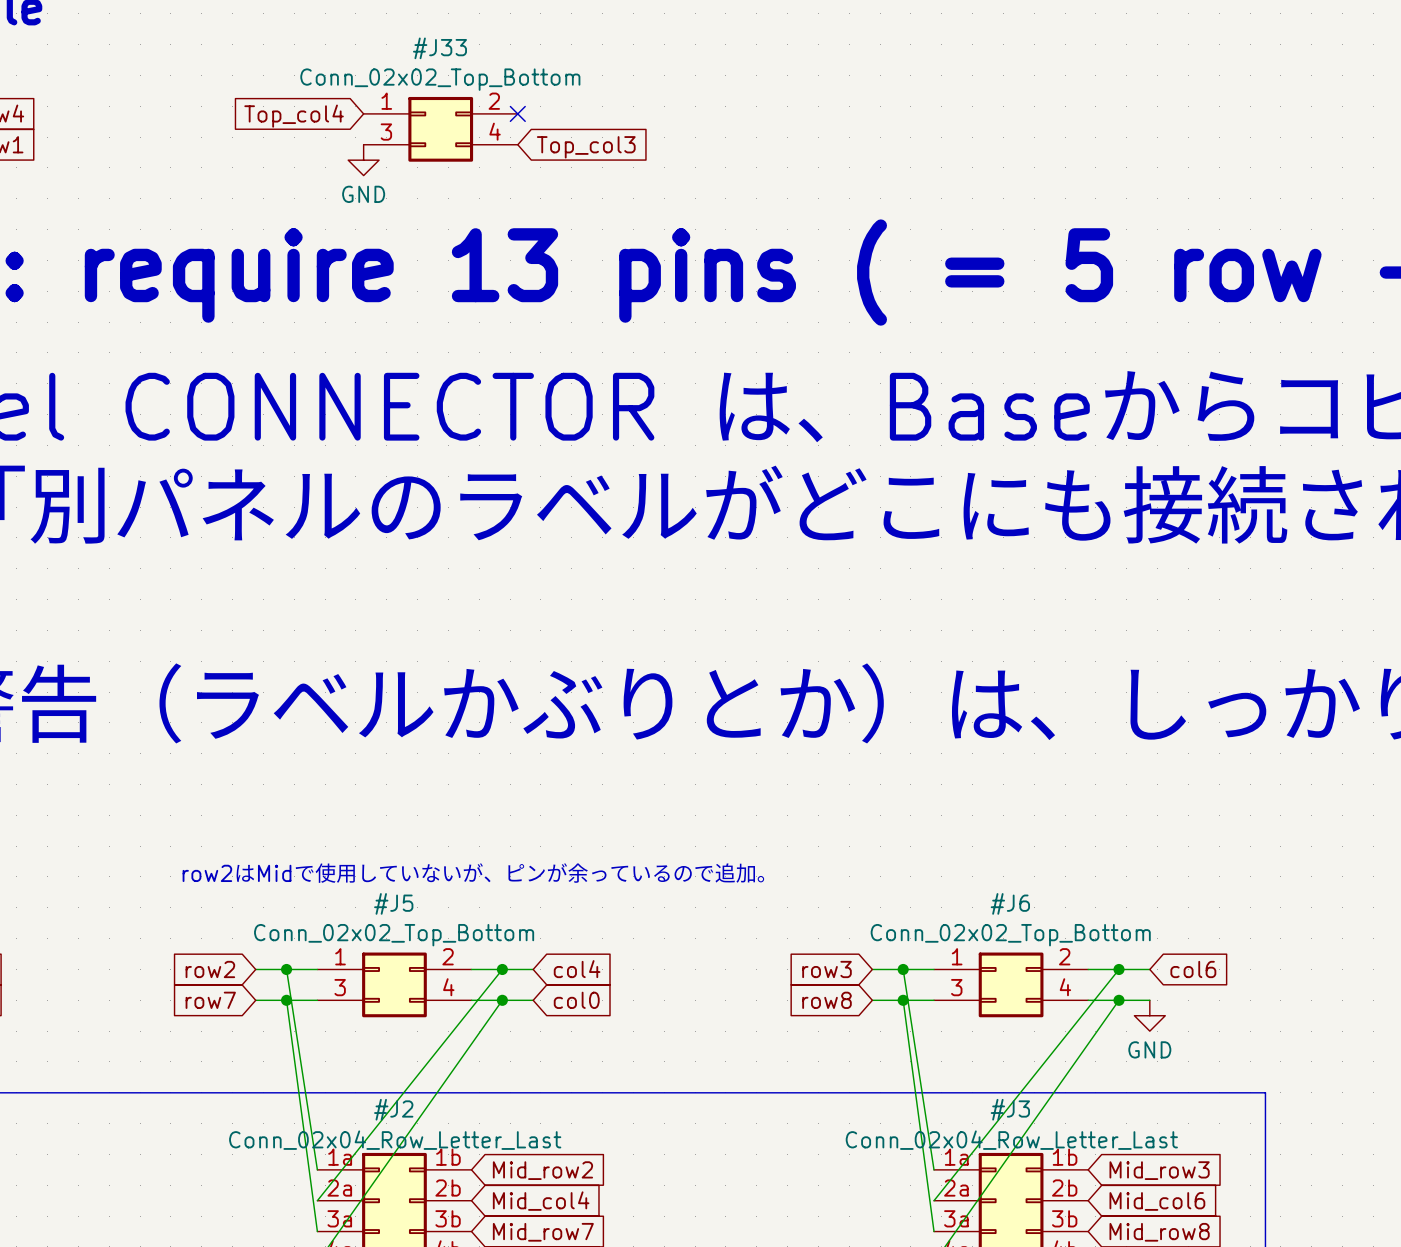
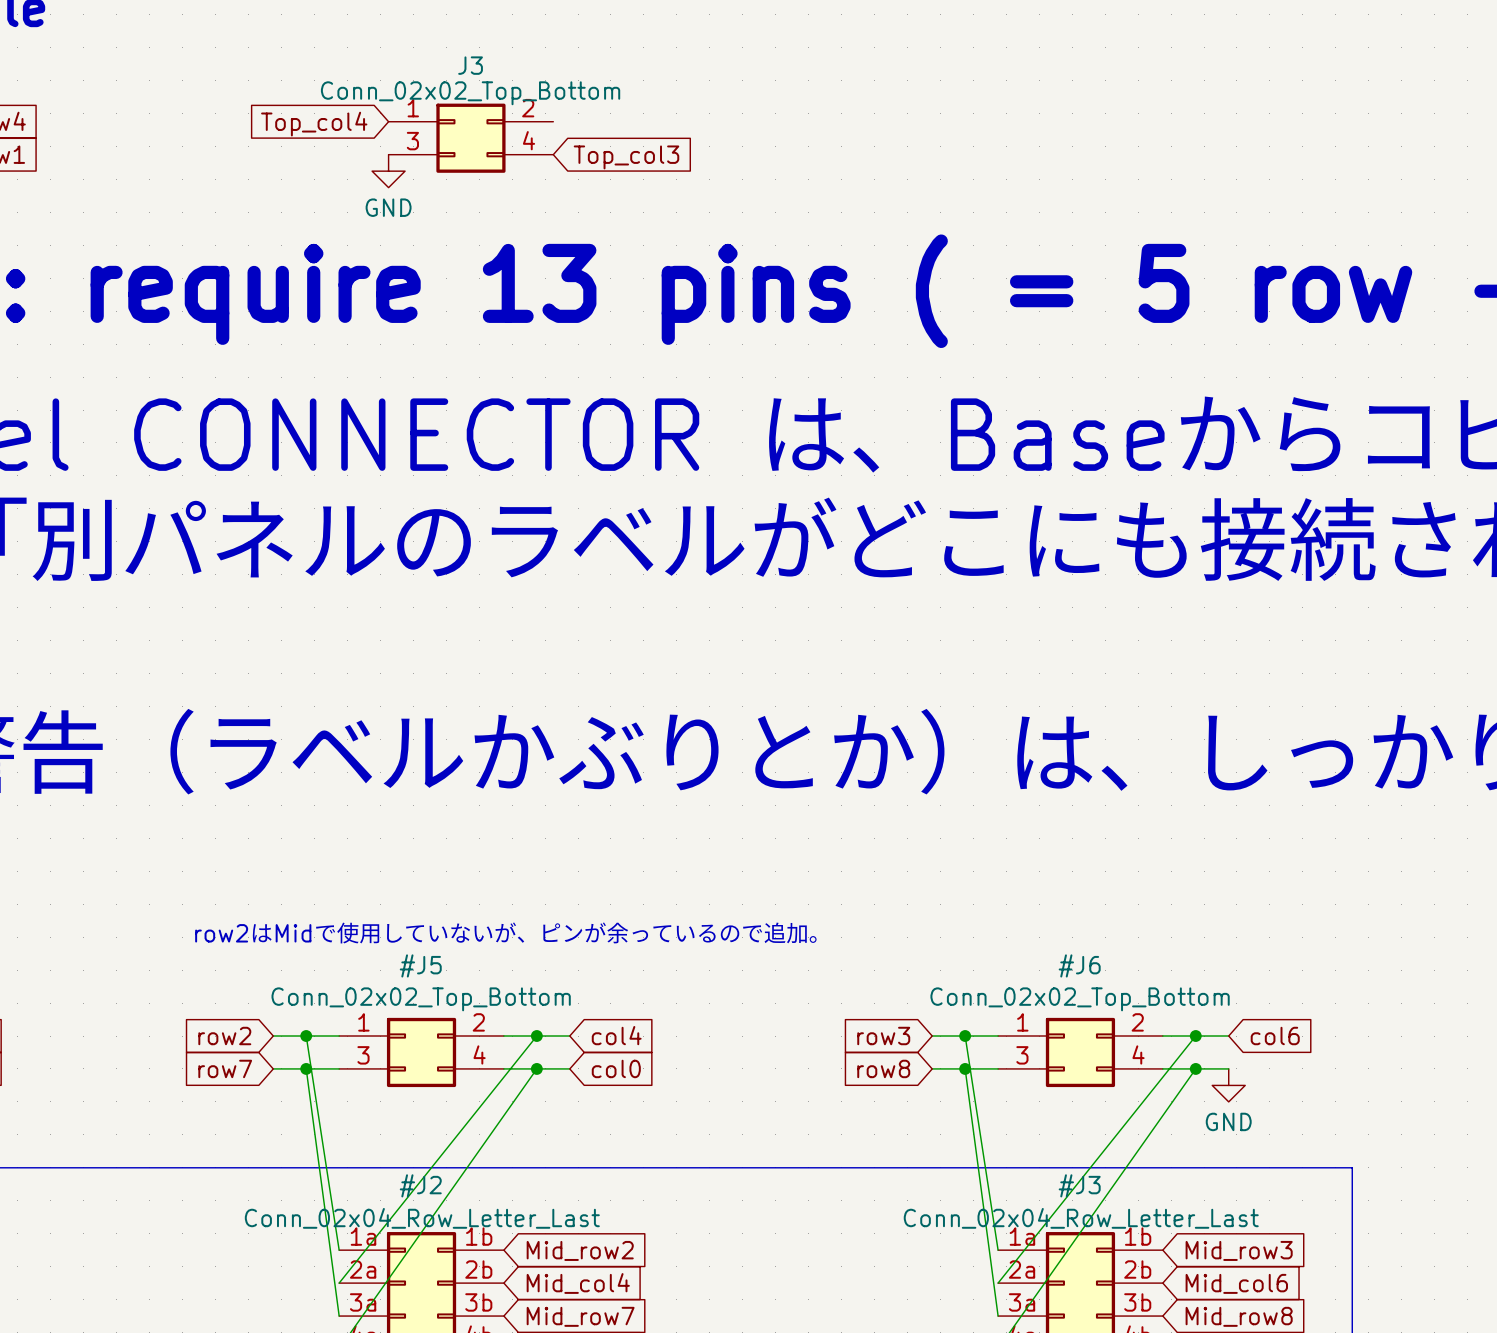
no-connect mark: (517, 113) -> none
#J33: Conn_02x02_Top_Bottom (440, 129) -> none
J3: none -> Conn_02x02_Top_Bottom (470, 138)

